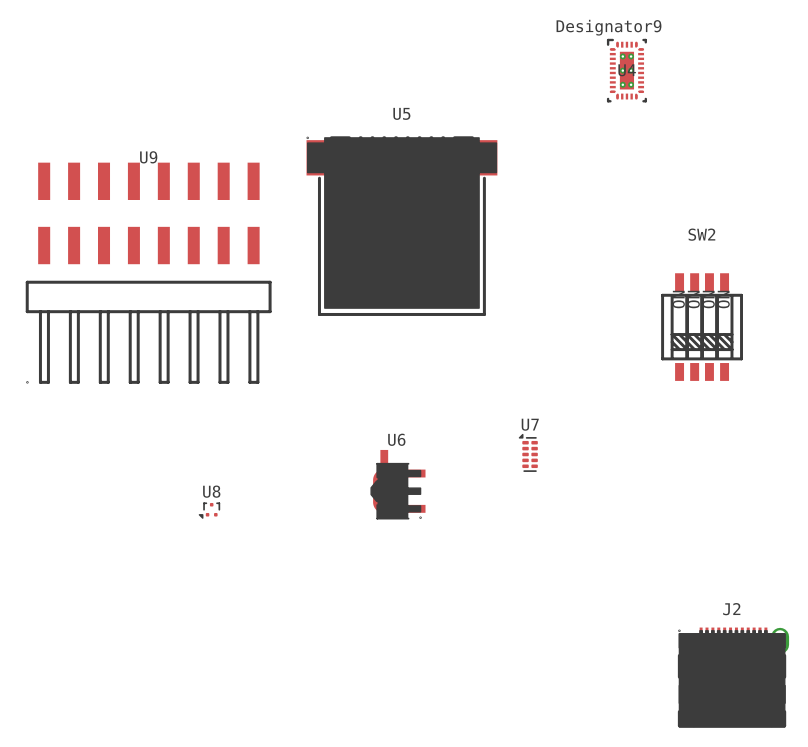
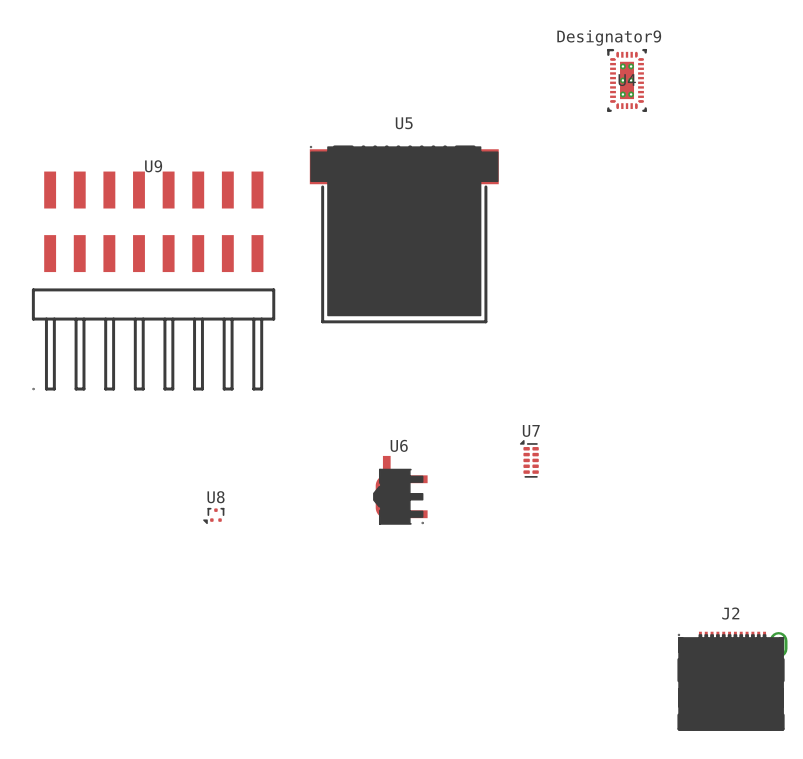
SW2: (702, 327) -> none

